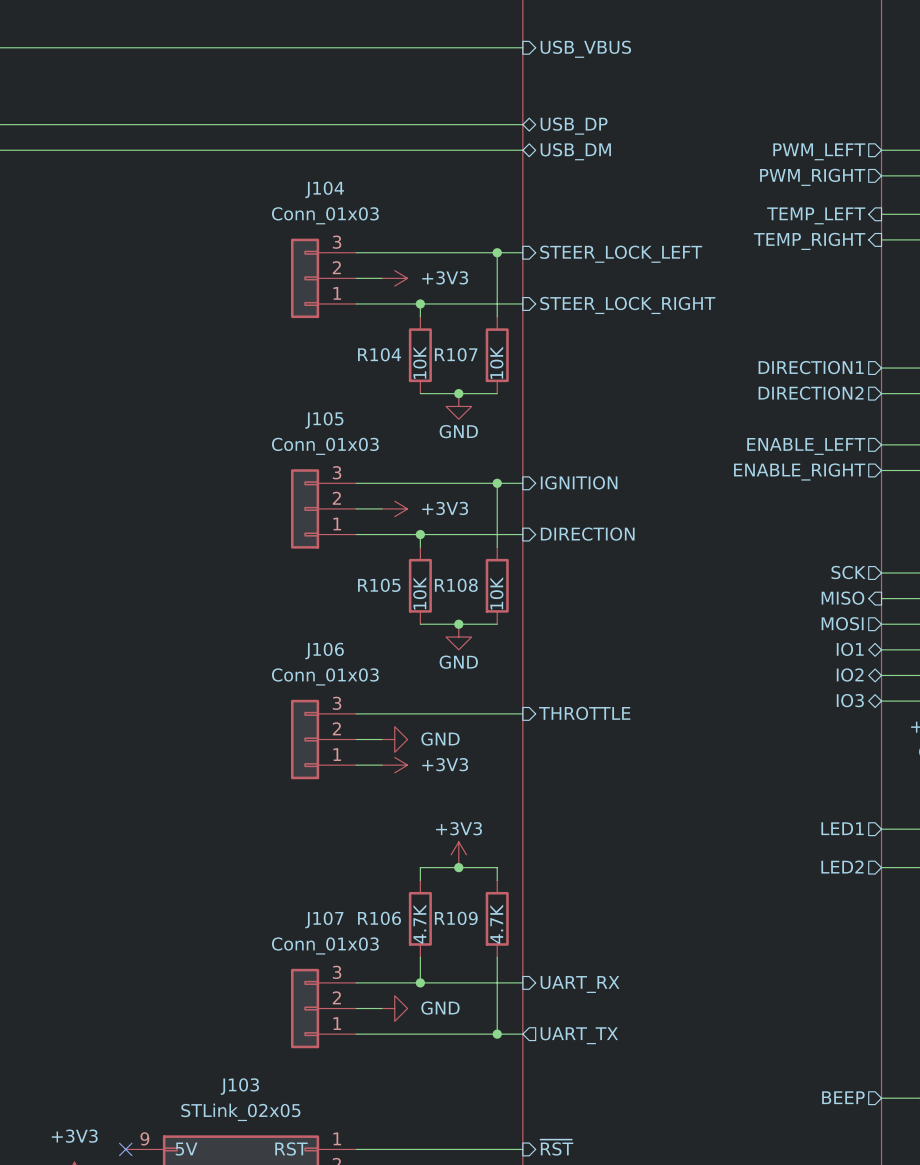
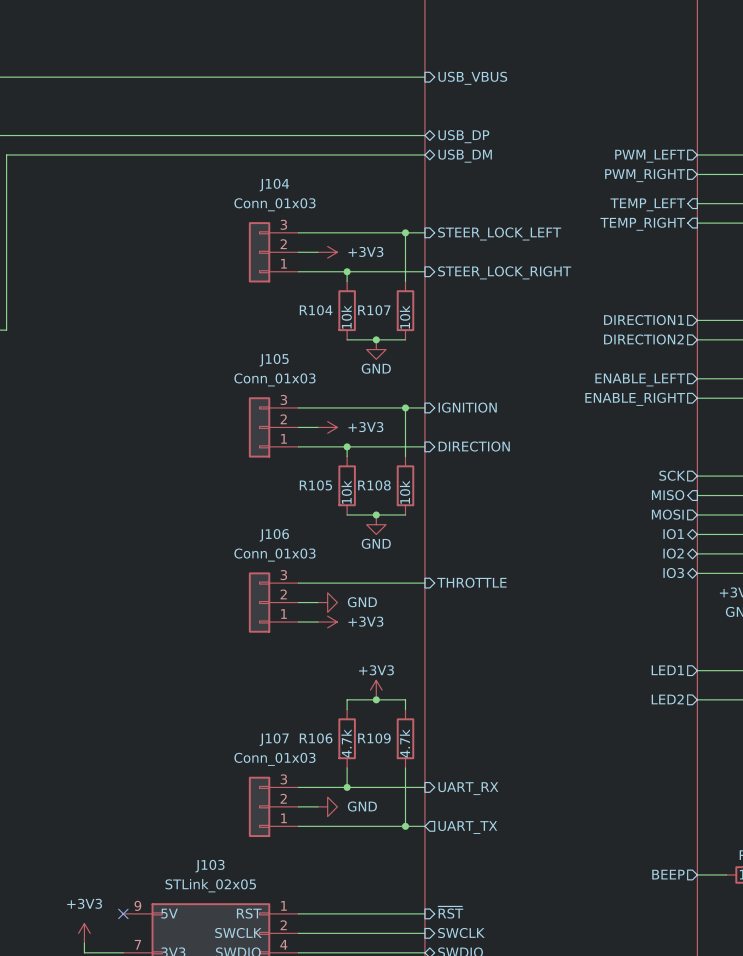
R104 value: 10K (419, 362) -> 10k (346, 317)
R107 value: 10K (496, 362) -> 10k (405, 317)
R105 value: 10K (419, 593) -> 10k (346, 492)
R108 value: 10K (496, 593) -> 10k (405, 492)
R106 value: 4.7K (419, 924) -> 4.7k (346, 743)
R109 value: 4.7K (496, 924) -> 4.7k (404, 743)

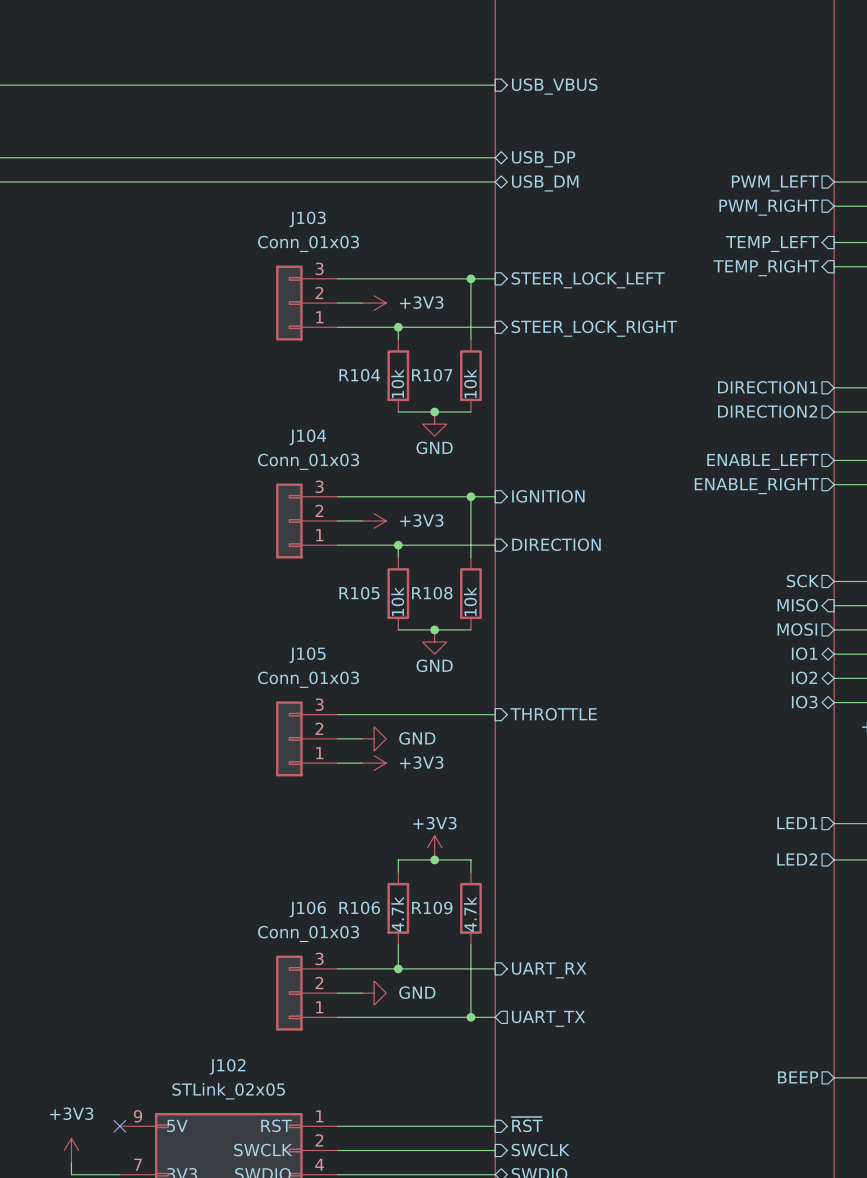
J104 name: J104 (274, 185) -> J103 (307, 219)
J105 name: J105 (274, 360) -> J104 (307, 437)
J106 name: J106 (274, 535) -> J105 (307, 655)
J107 name: J107 (274, 739) -> J106 (307, 909)
J103 name: J103 (210, 866) -> J102 (227, 1066)

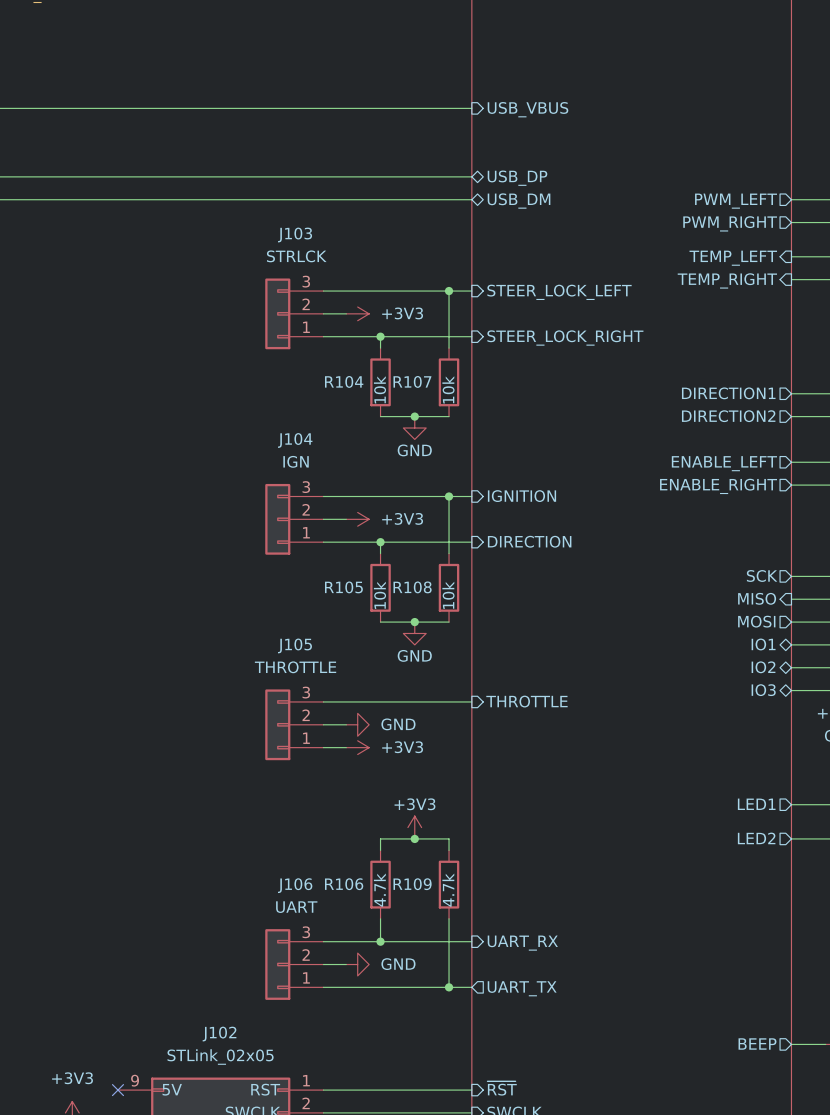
J103 value: Conn_01x03 (308, 243) -> STRLCK (296, 256)
J104 value: Conn_01x03 (308, 461) -> IGN (296, 461)
J105 value: Conn_01x03 (308, 679) -> THROTTLE (295, 667)
J106 value: Conn_01x03 (308, 933) -> UART (296, 907)

